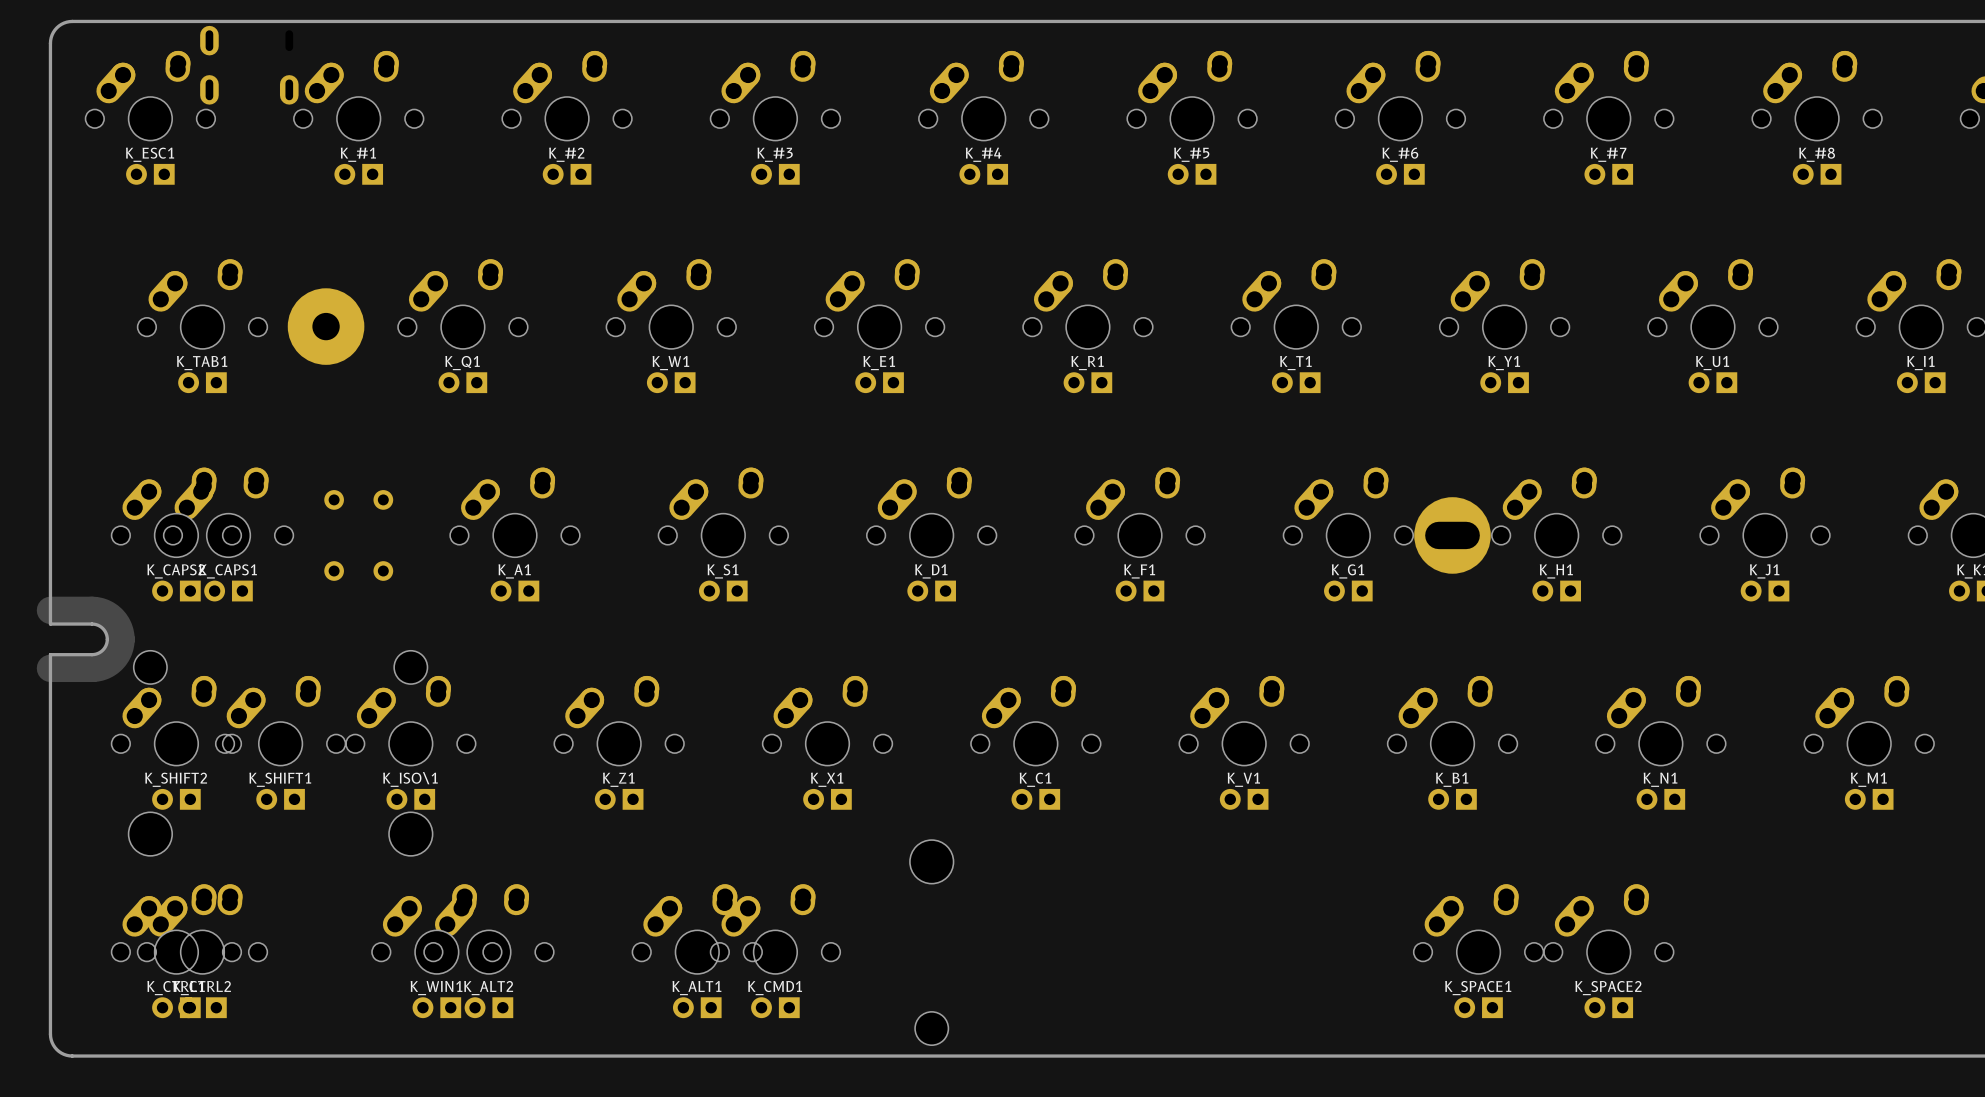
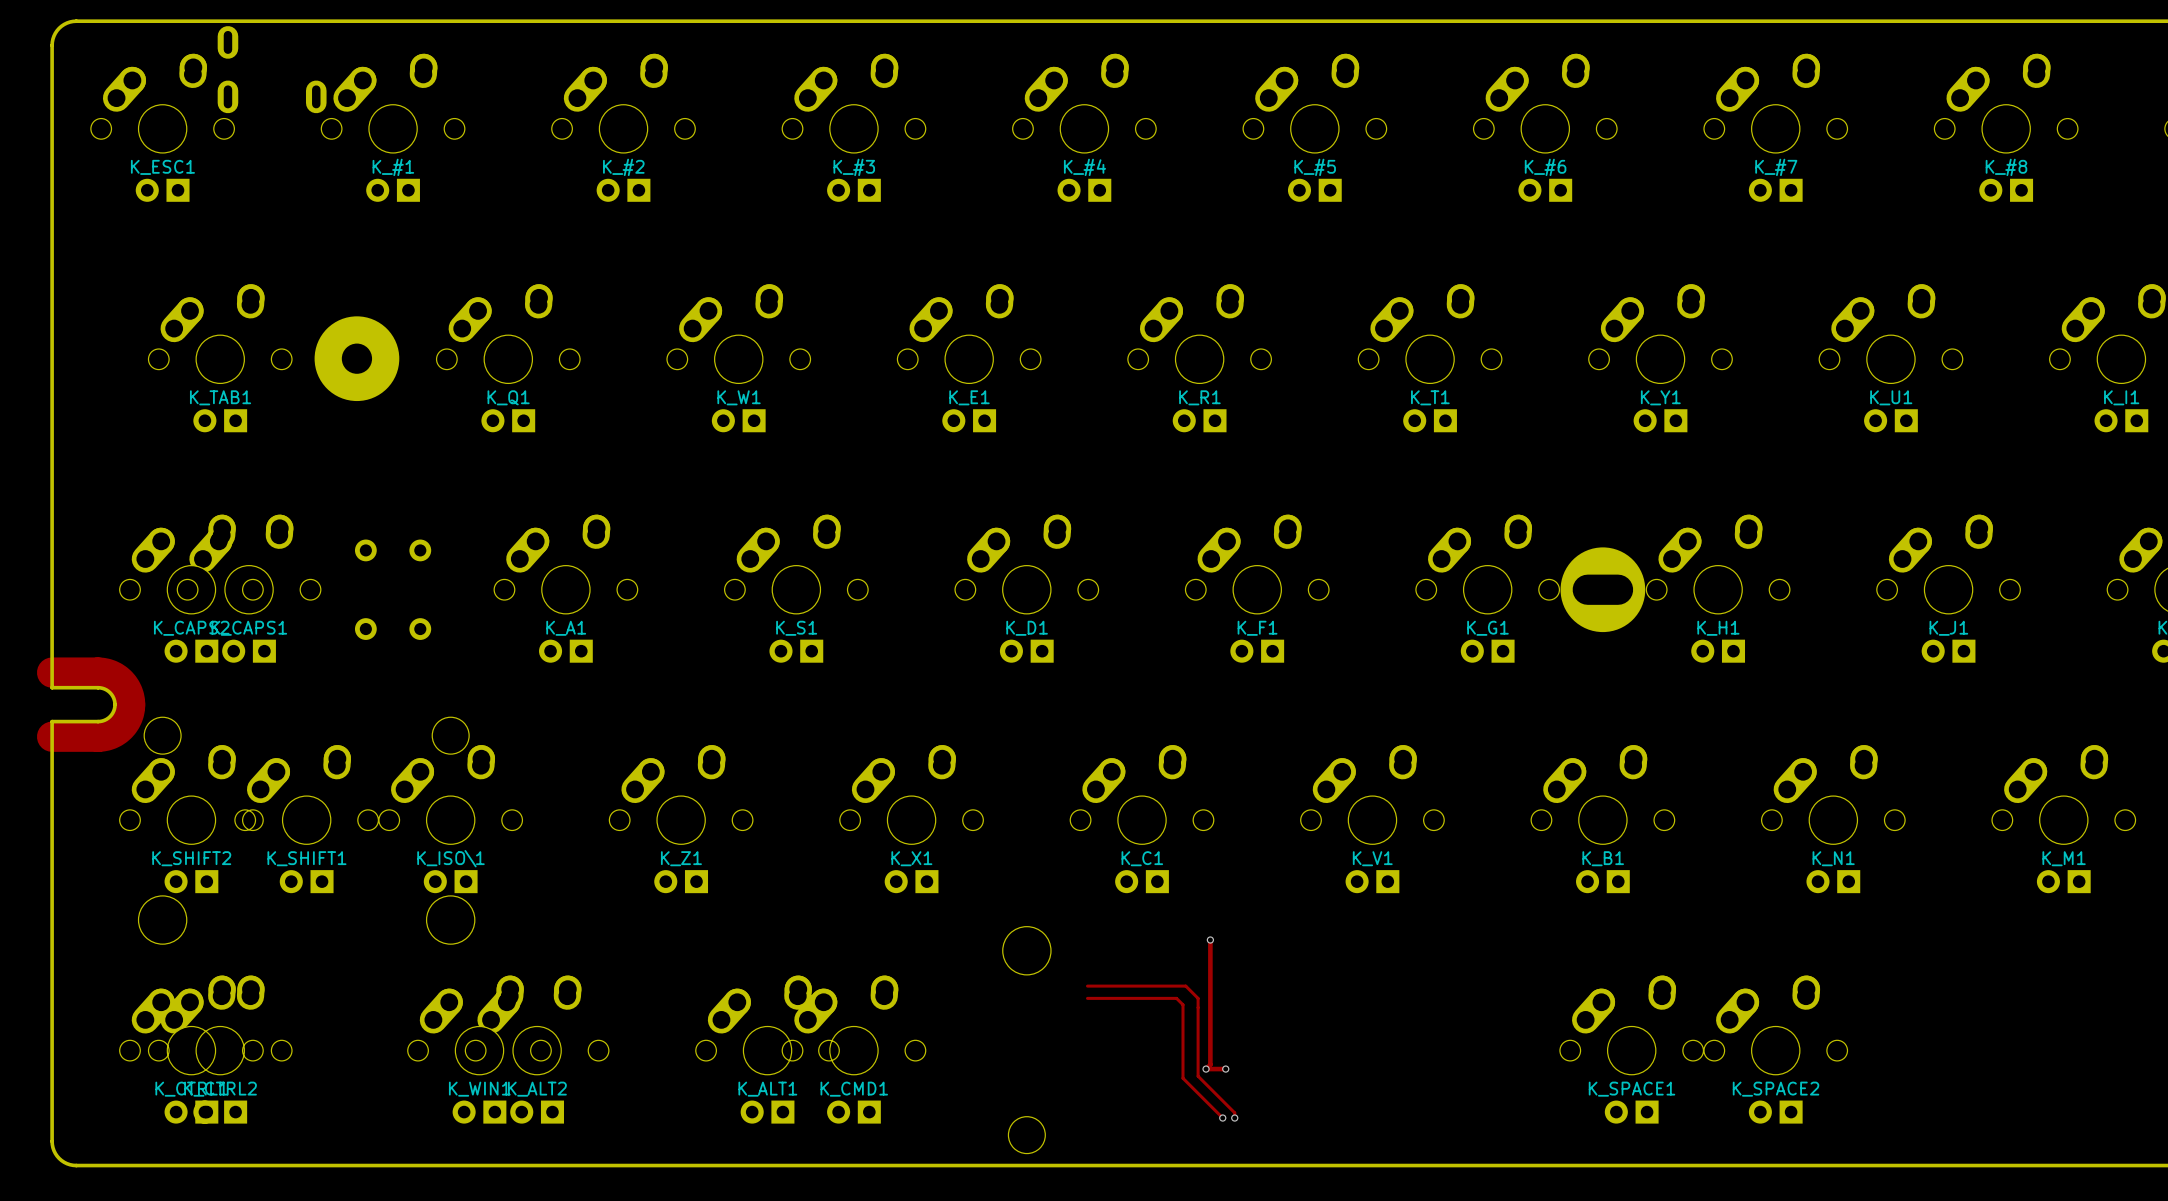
track: none -> (1210, 940) (1210, 1064) (1206, 1069) (1225, 1069)
via: none -> (1210, 940)
track: none -> (1087, 986) (1185, 986) (1198, 998) (1198, 1076) (1234, 1112) (1234, 1118)
track: none -> (1087, 998) (1176, 998) (1183, 1004) (1183, 1078) (1222, 1118)
via: none -> (1206, 1069)
via: none -> (1225, 1069)
via: none -> (1222, 1118)
via: none -> (1234, 1118)

